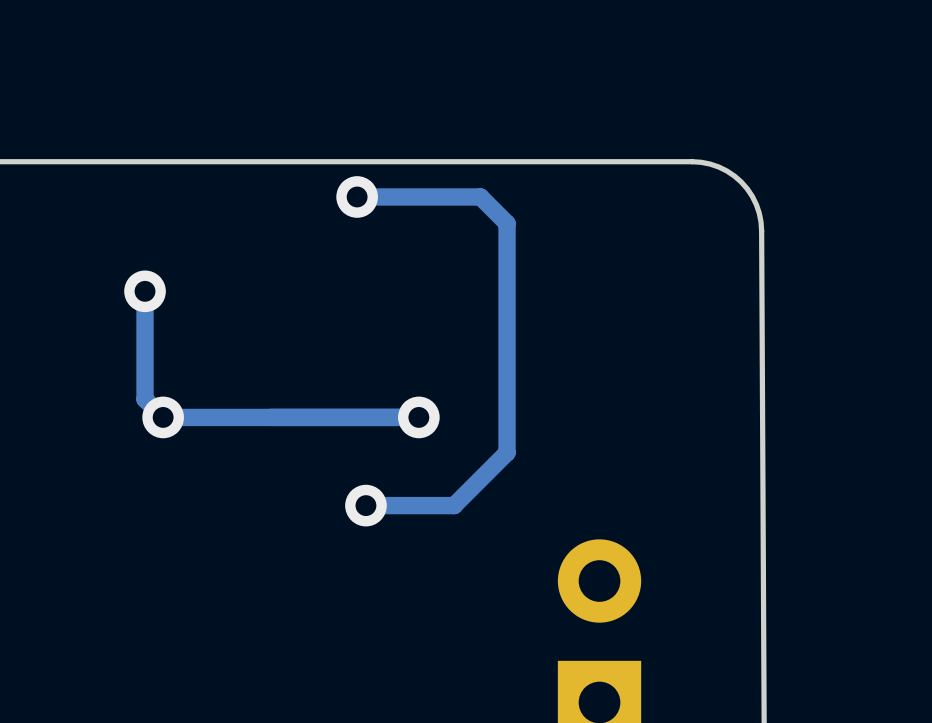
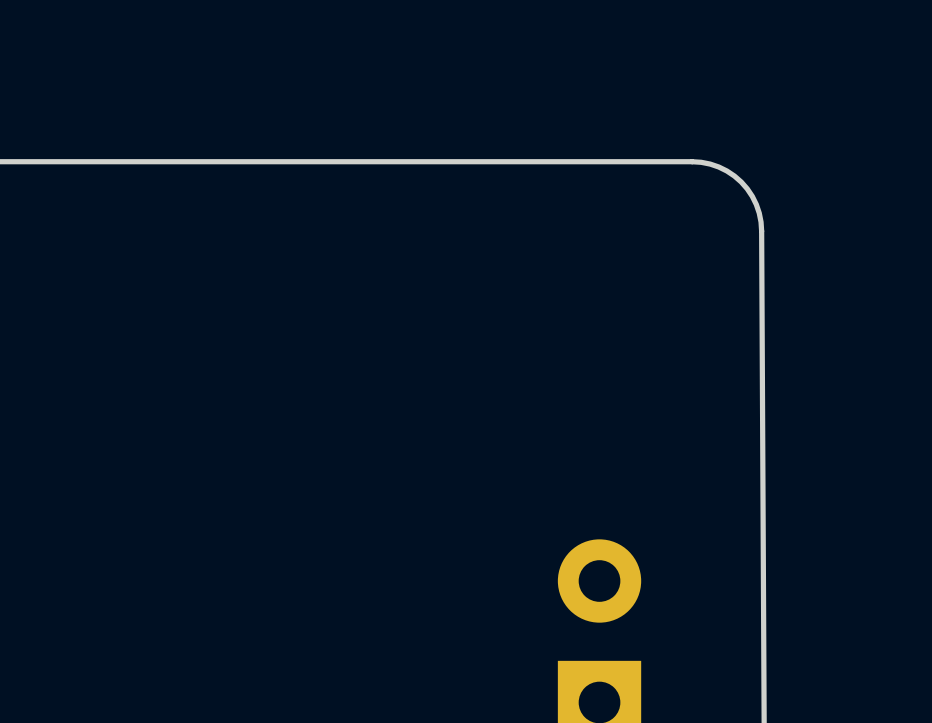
track: (357, 196) (480, 196) (507, 223) (507, 452) (454, 505) (365, 505) -> none
via: (357, 196) -> none
track: (145, 291) (145, 399) (163, 417) (418, 417) -> none
via: (145, 291) -> none
via: (163, 417) -> none
via: (418, 417) -> none
via: (365, 505) -> none

